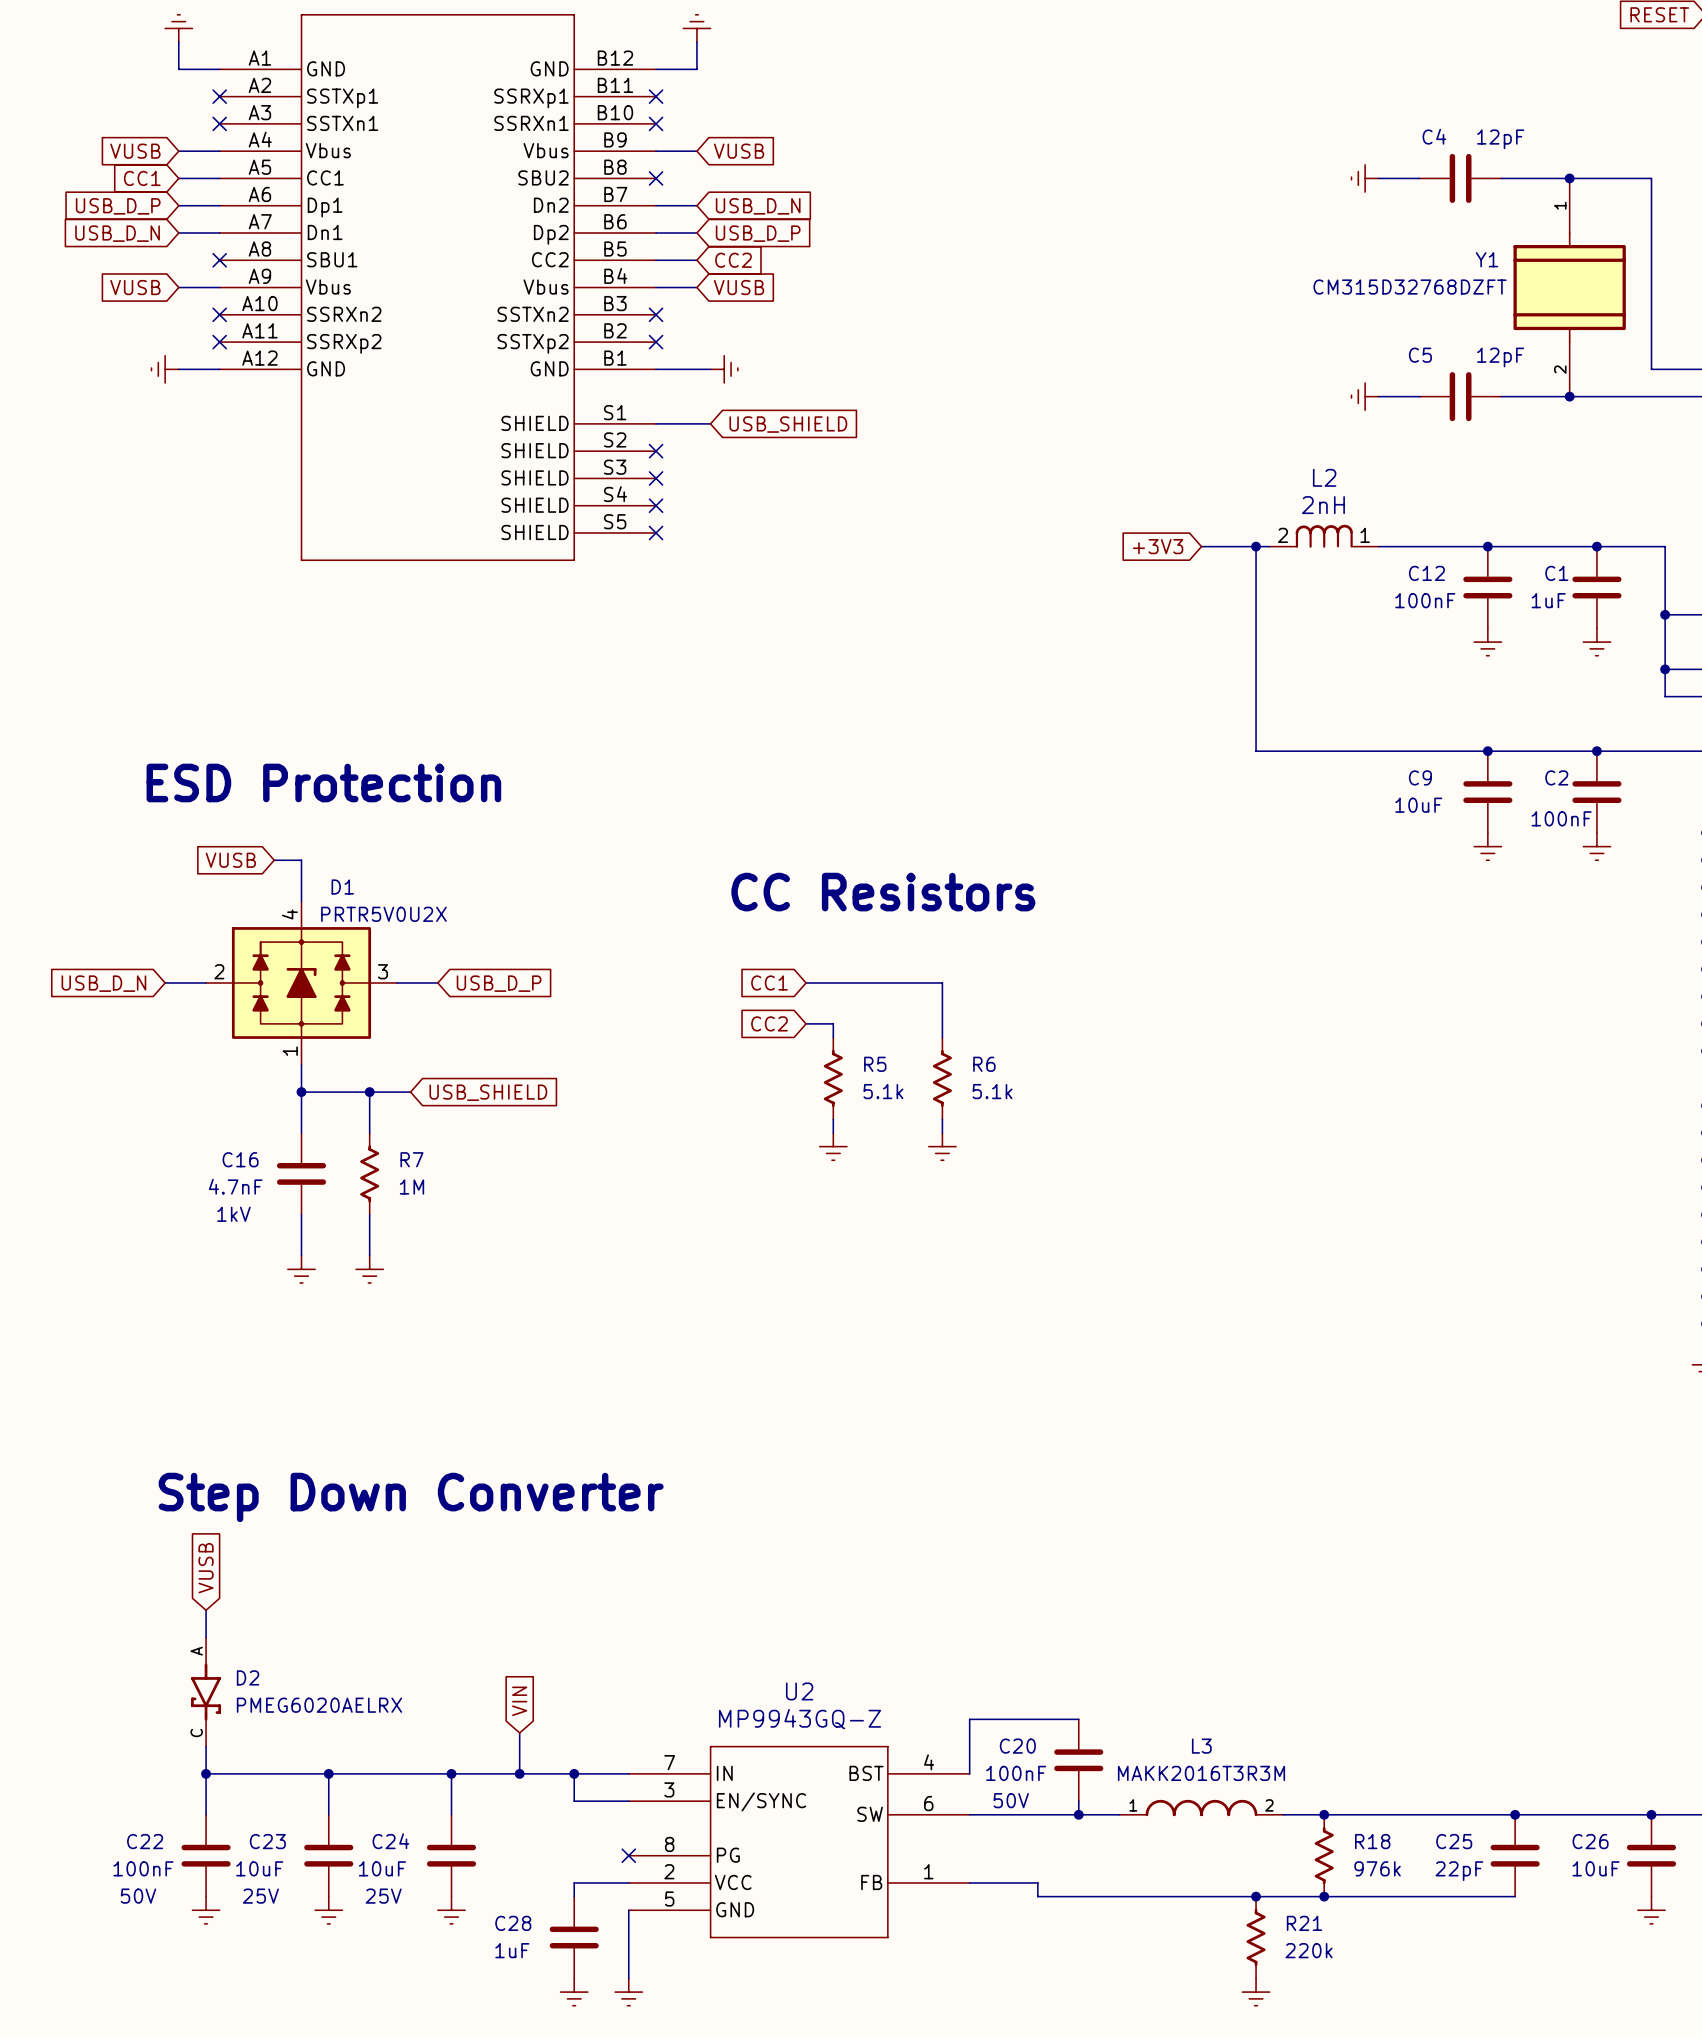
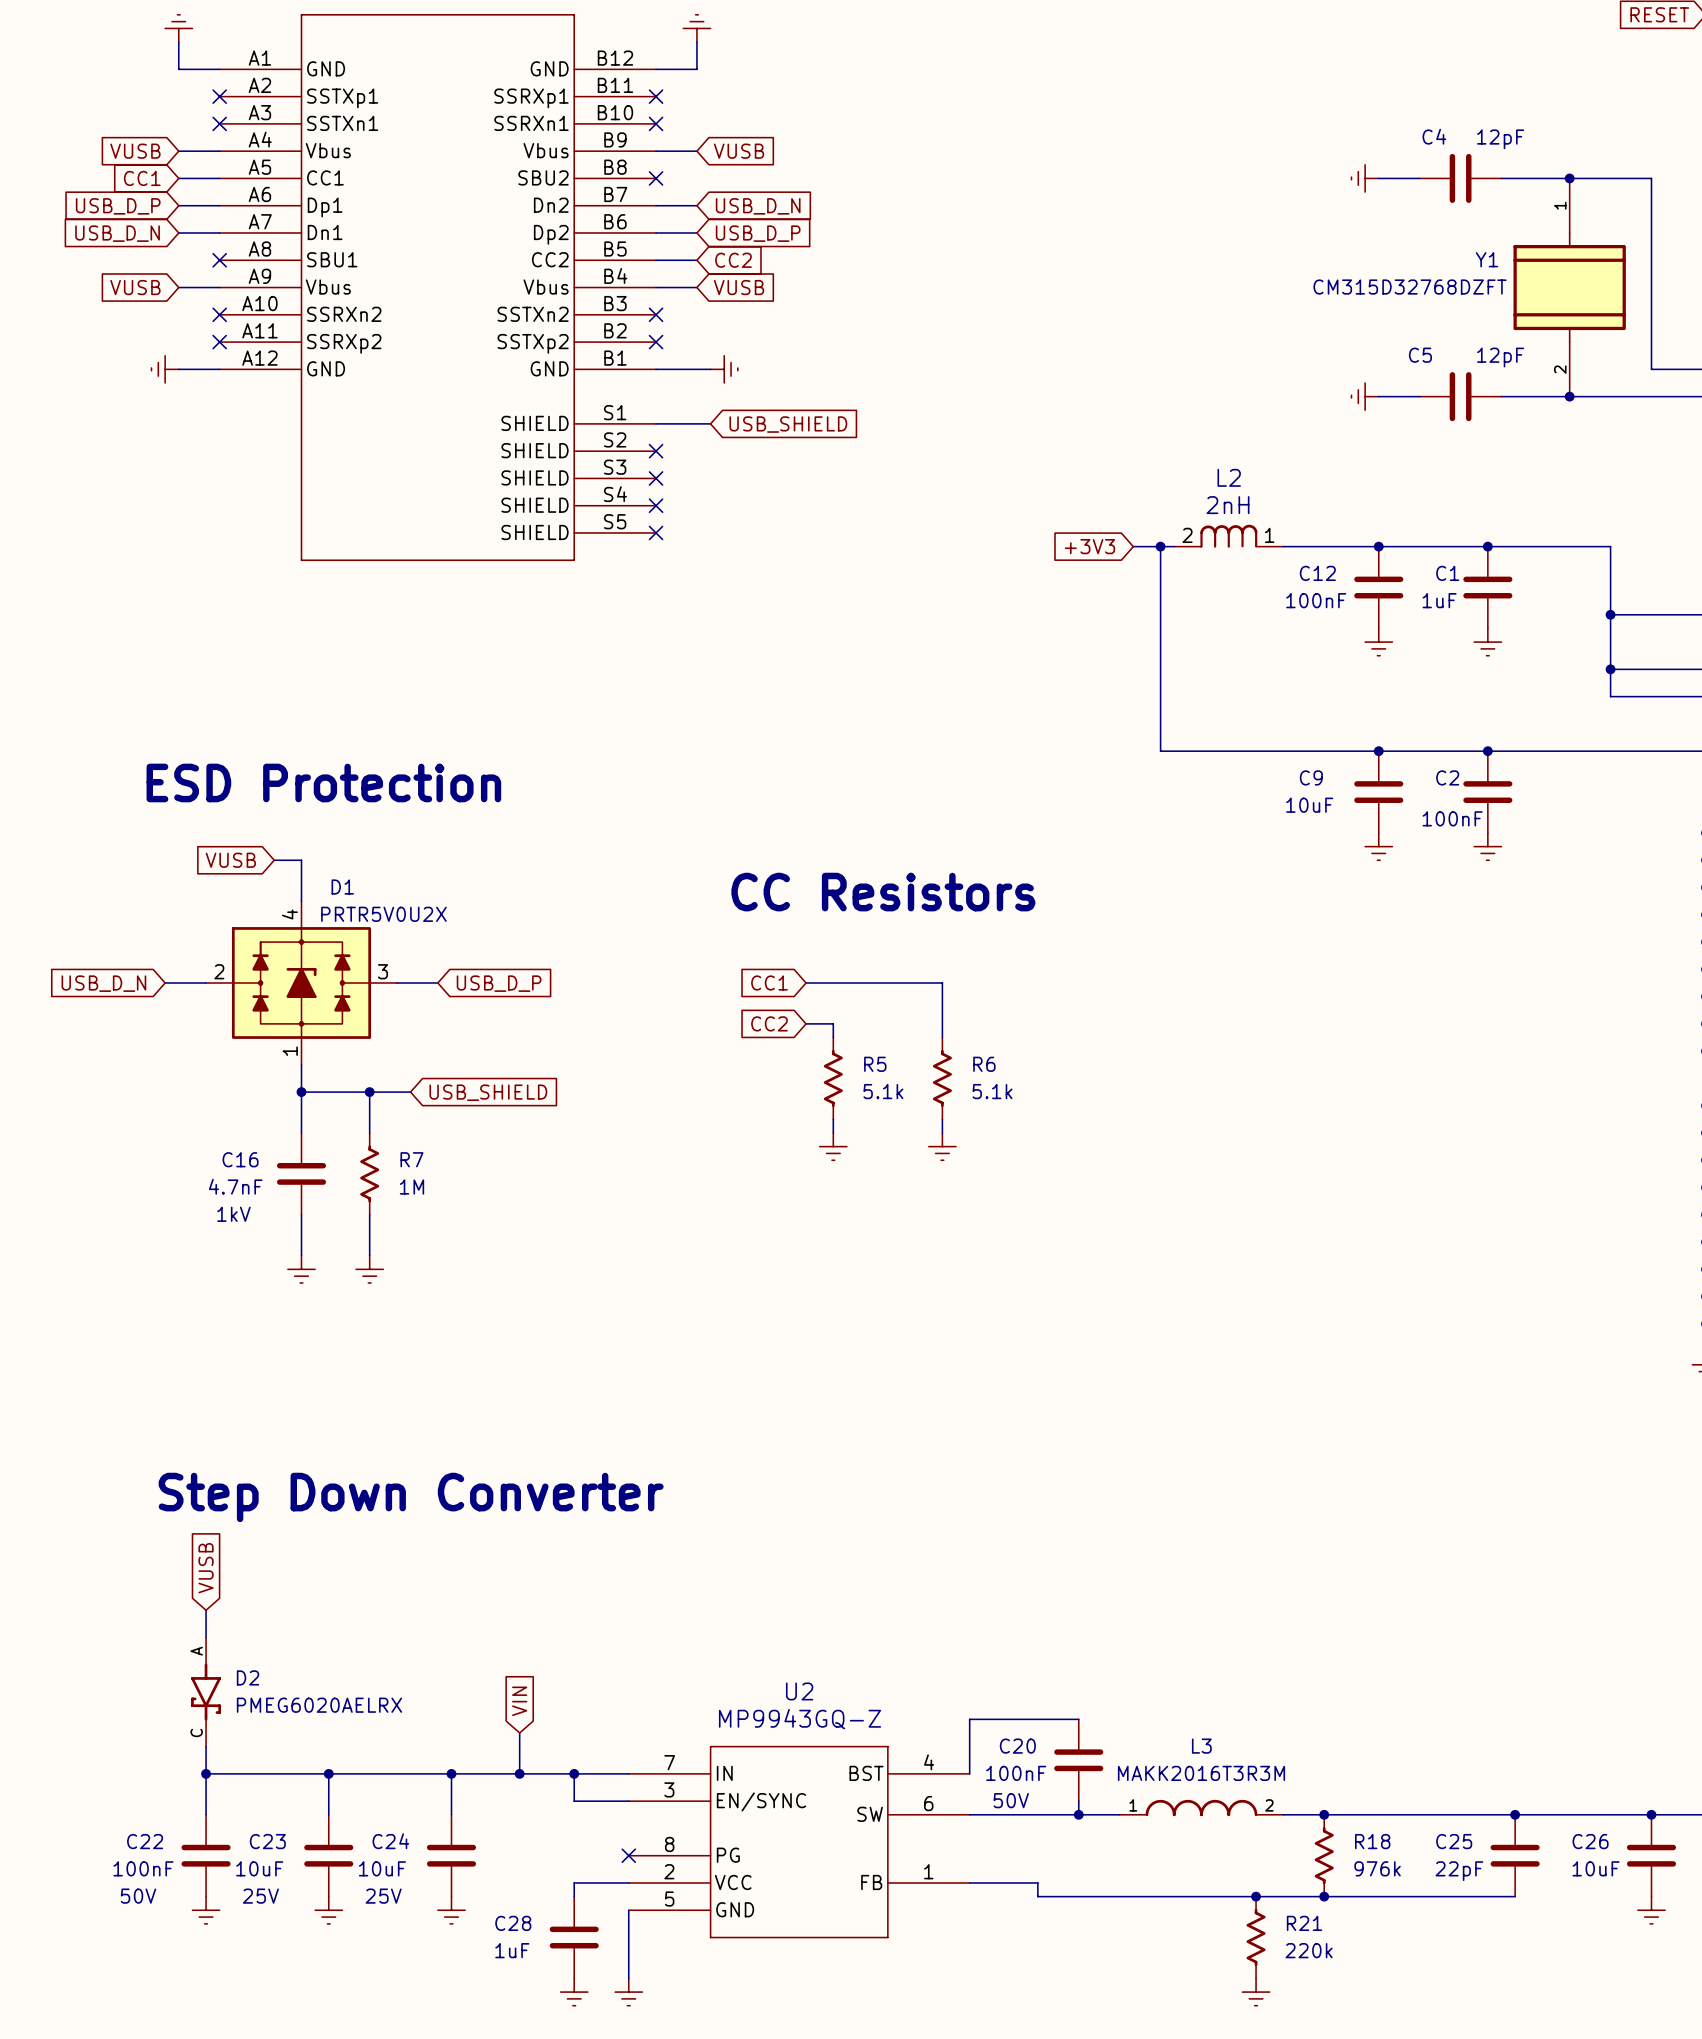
L2 position: (1324, 536) -> (1228, 536)
wire: none -> (1133, 546) (1174, 546)
global label position: +3V3 (1158, 546) -> +3V3 (1089, 546)
junction: none -> (1160, 546)
wire: (1201, 546) (1269, 546) -> none
wire: (1256, 546) (1256, 751) -> (1160, 546) (1160, 751) (1256, 751)
junction: (1256, 546) -> none
wire: none -> (1283, 546) (1378, 546)
junction: none -> (1378, 546)
junction: (1596, 546) -> none
wire: (1610, 546) (1665, 546) (1665, 696) -> (1610, 546) (1610, 696) (1665, 696)
C12 name: C12 (1426, 573) -> C1 (1447, 573)
C12: none -> 100nF (1378, 587)
C1: 1uF (1596, 587) -> none
C12 value: 100nF (1425, 600) -> 1uF (1439, 600)
wire: none -> (1610, 614) (1665, 614)
junction: none -> (1610, 614)
junction: (1665, 614) -> none
power symbol: none -> (1378, 642)
power symbol: (1596, 642) -> none
wire: none -> (1610, 669) (1665, 669)
junction: none -> (1610, 669)
junction: (1665, 669) -> none
junction: none -> (1378, 751)
junction: (1596, 751) -> none
C9 name: C9 (1420, 777) -> C2 (1447, 777)
C9: none -> 10uF (1378, 792)
C2: 100nF (1596, 792) -> none
C9 value: 10uF (1418, 805) -> 100nF (1452, 818)
power symbol: none -> (1378, 846)
power symbol: (1596, 846) -> none

